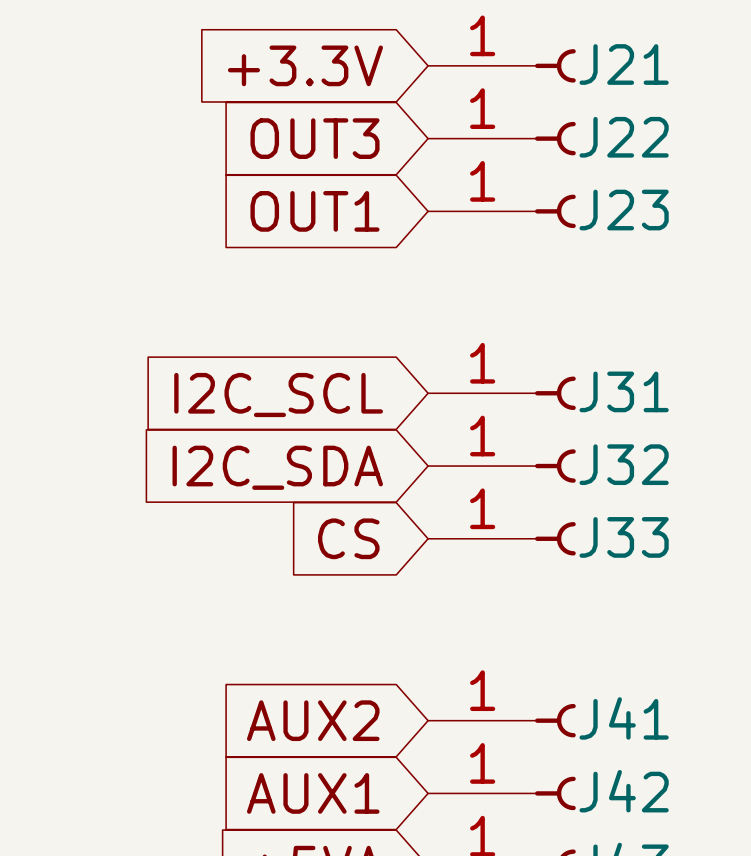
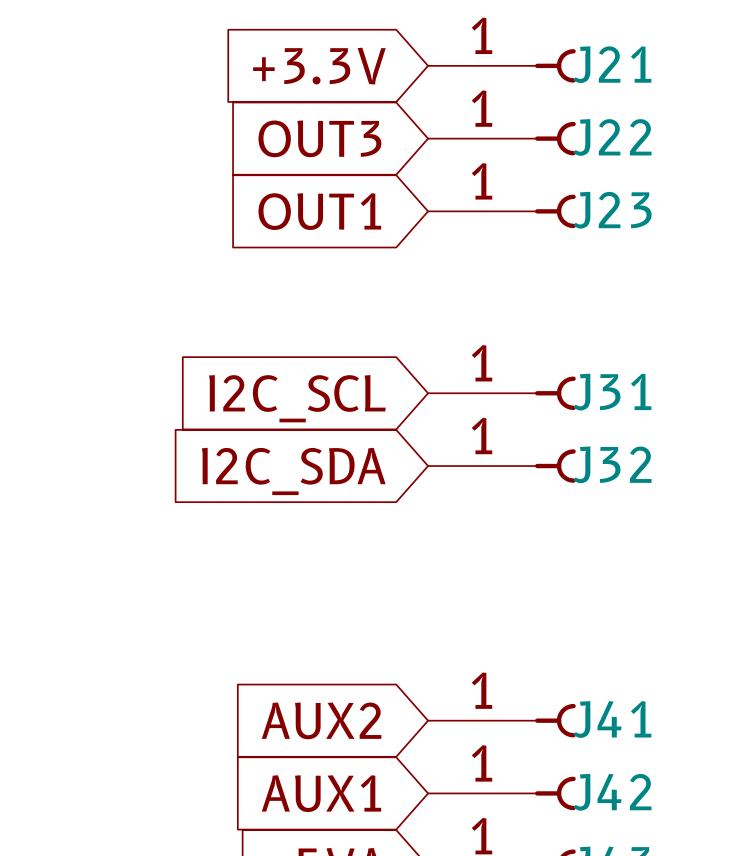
global label: CS (348, 538) -> none
J33: (501, 538) -> none

